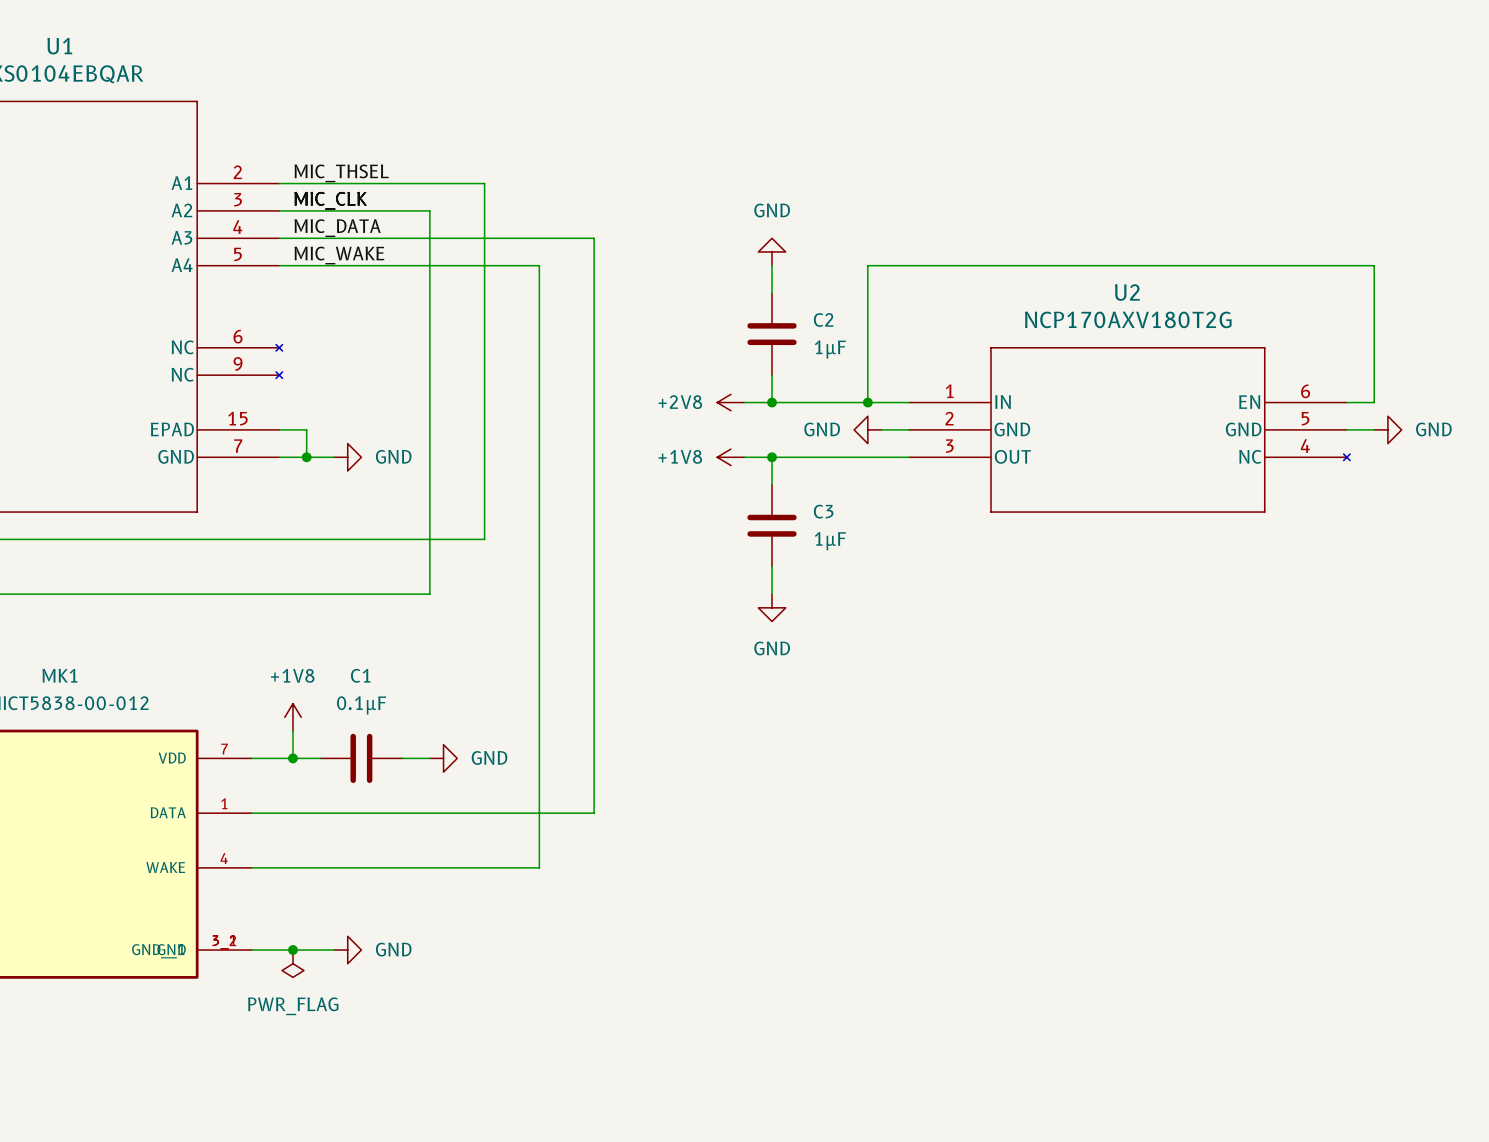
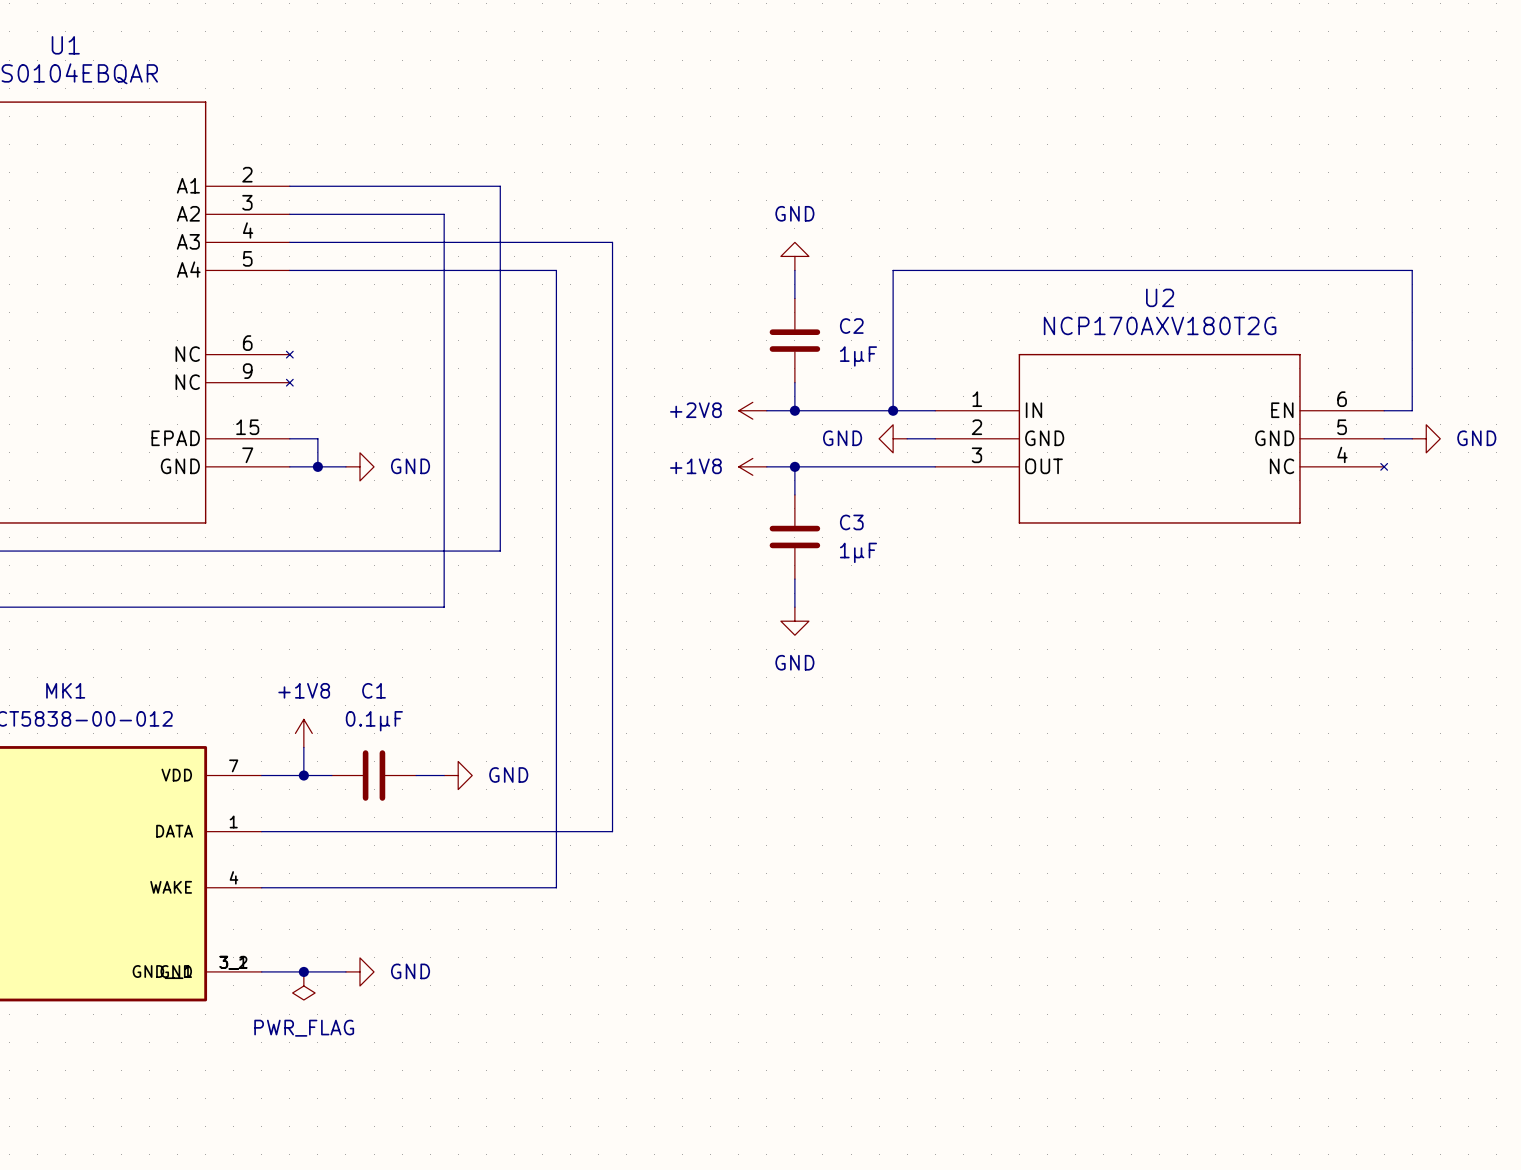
label: MIC_THSEL (341, 173) -> none
label: MIC_CLK (330, 200) -> none
label: MIC_DATA (337, 228) -> none
label: MIC_WAKE (339, 255) -> none

